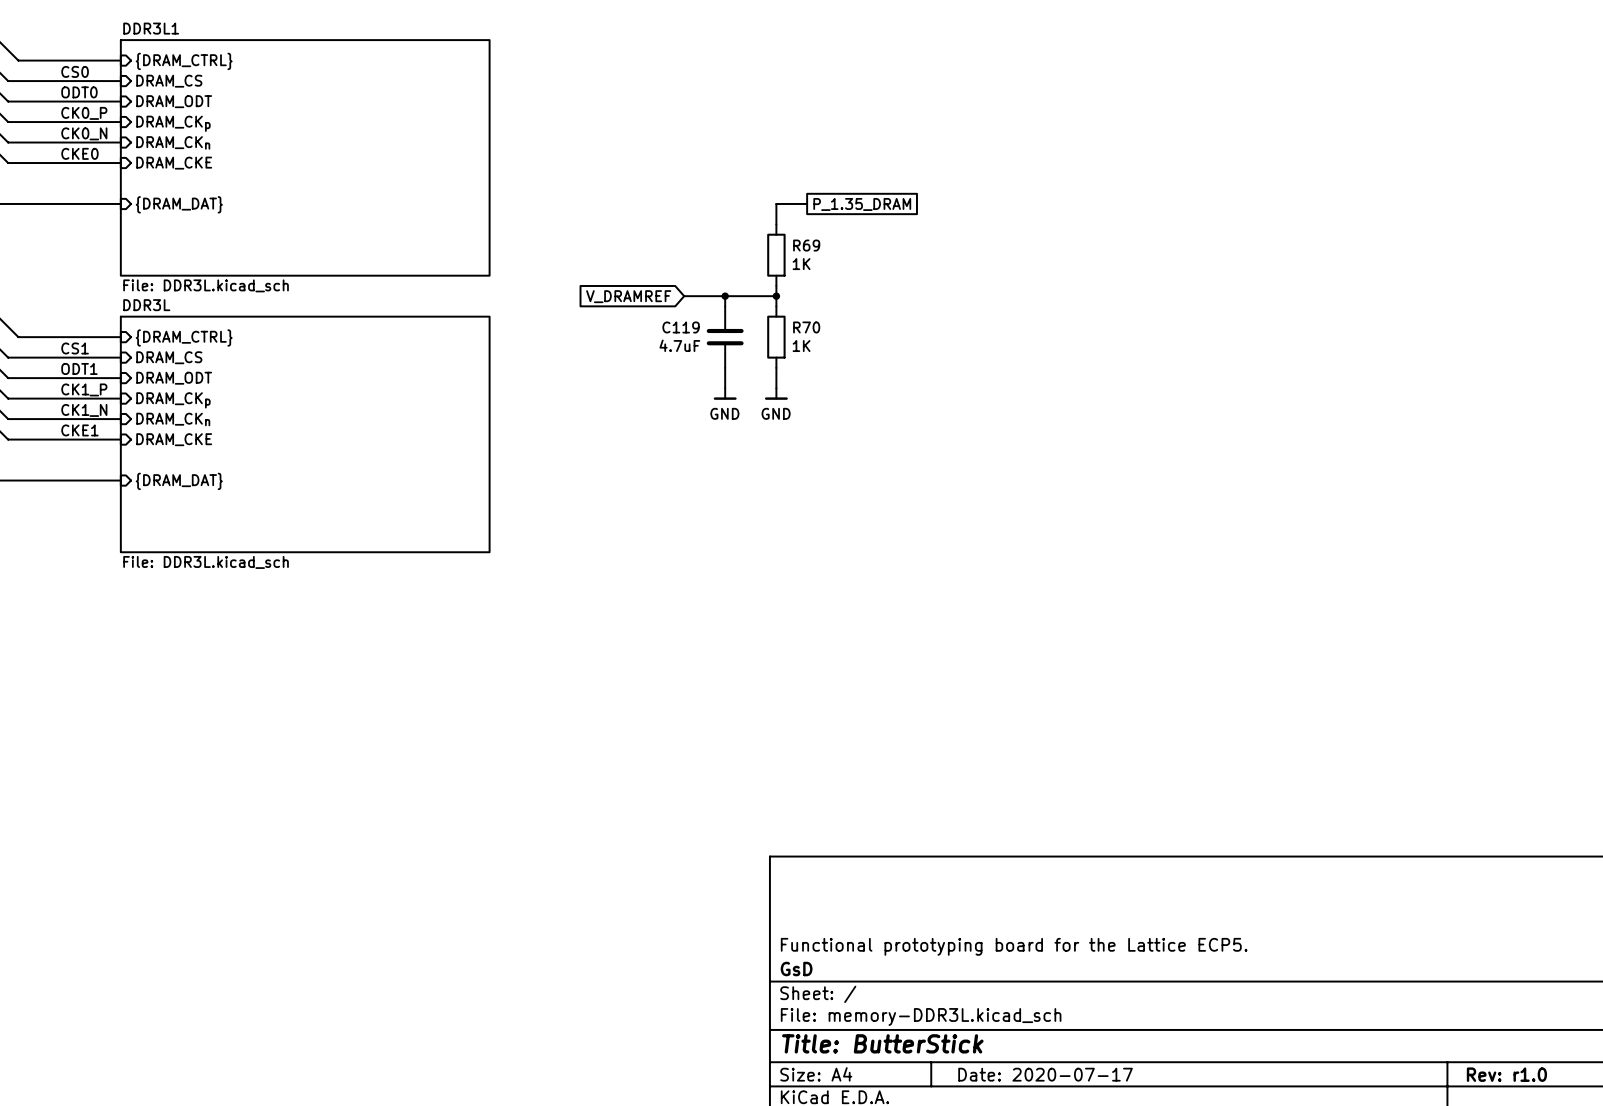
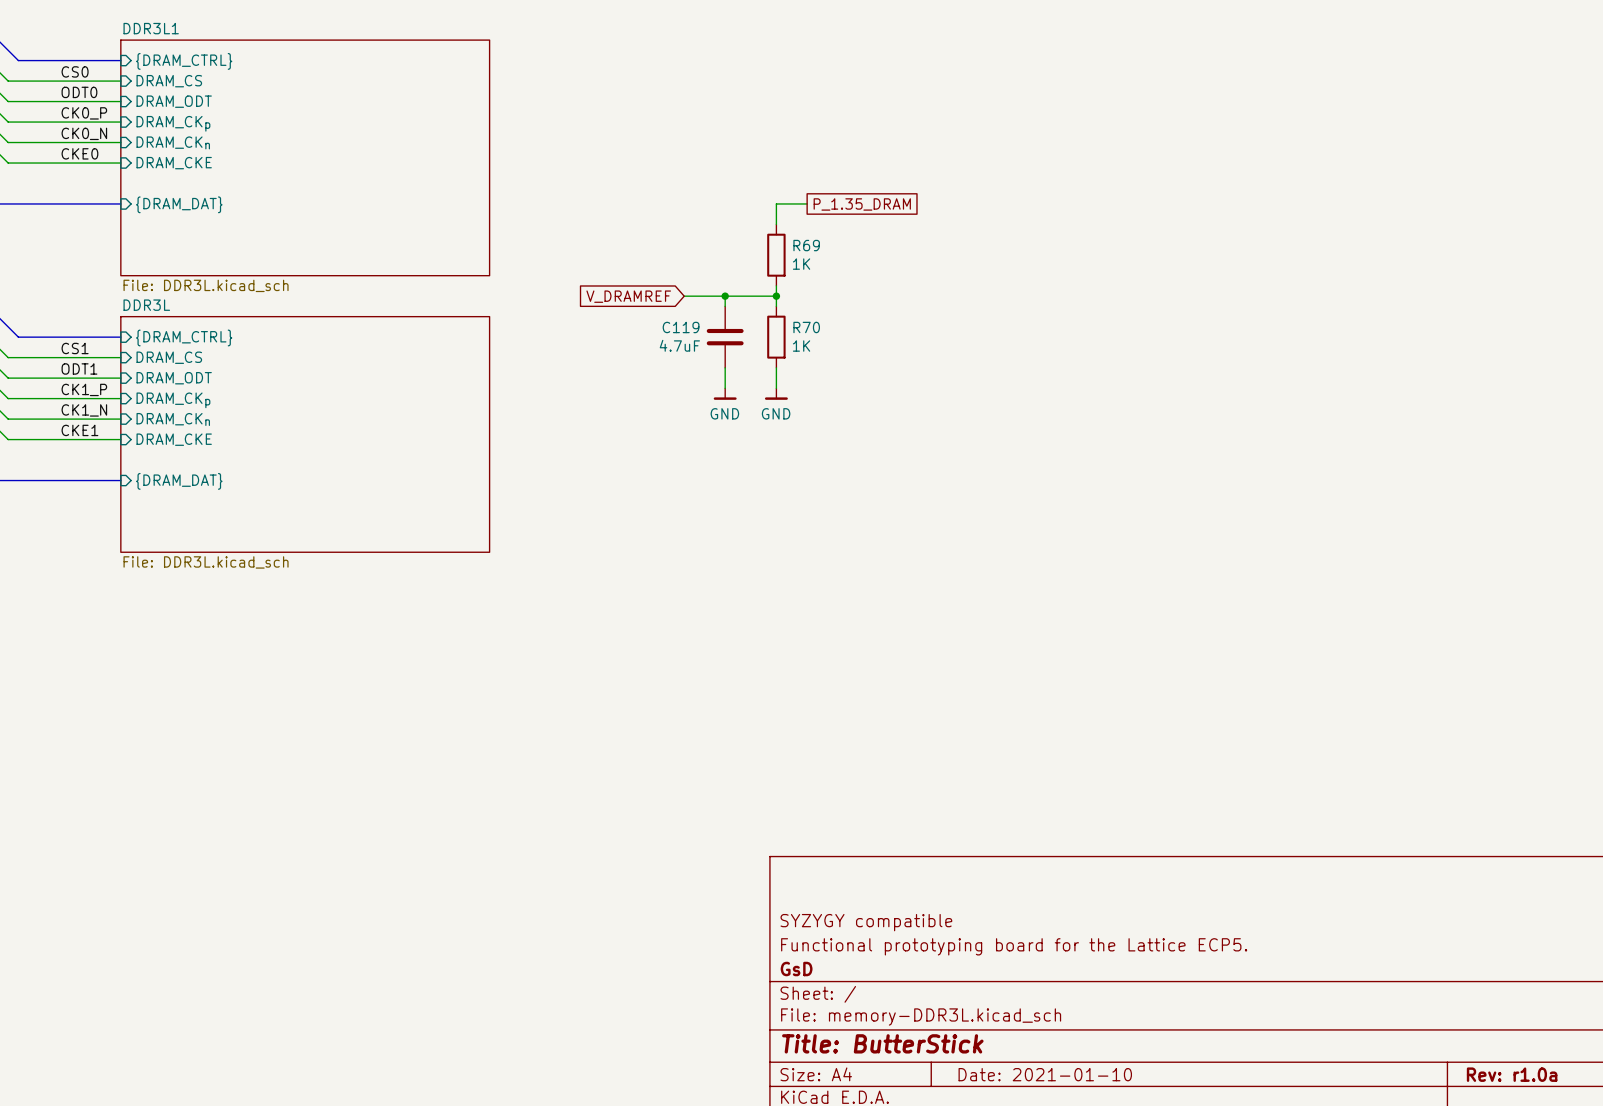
title block: none -> SYZYGY compatible (866, 922)
title block: Date: 2020-07-17 (1045, 1074) -> Date: 2021-01-10 (1045, 1074)
title block: Rev: r1.0 (1506, 1074) -> Rev: r1.0a (1512, 1074)

